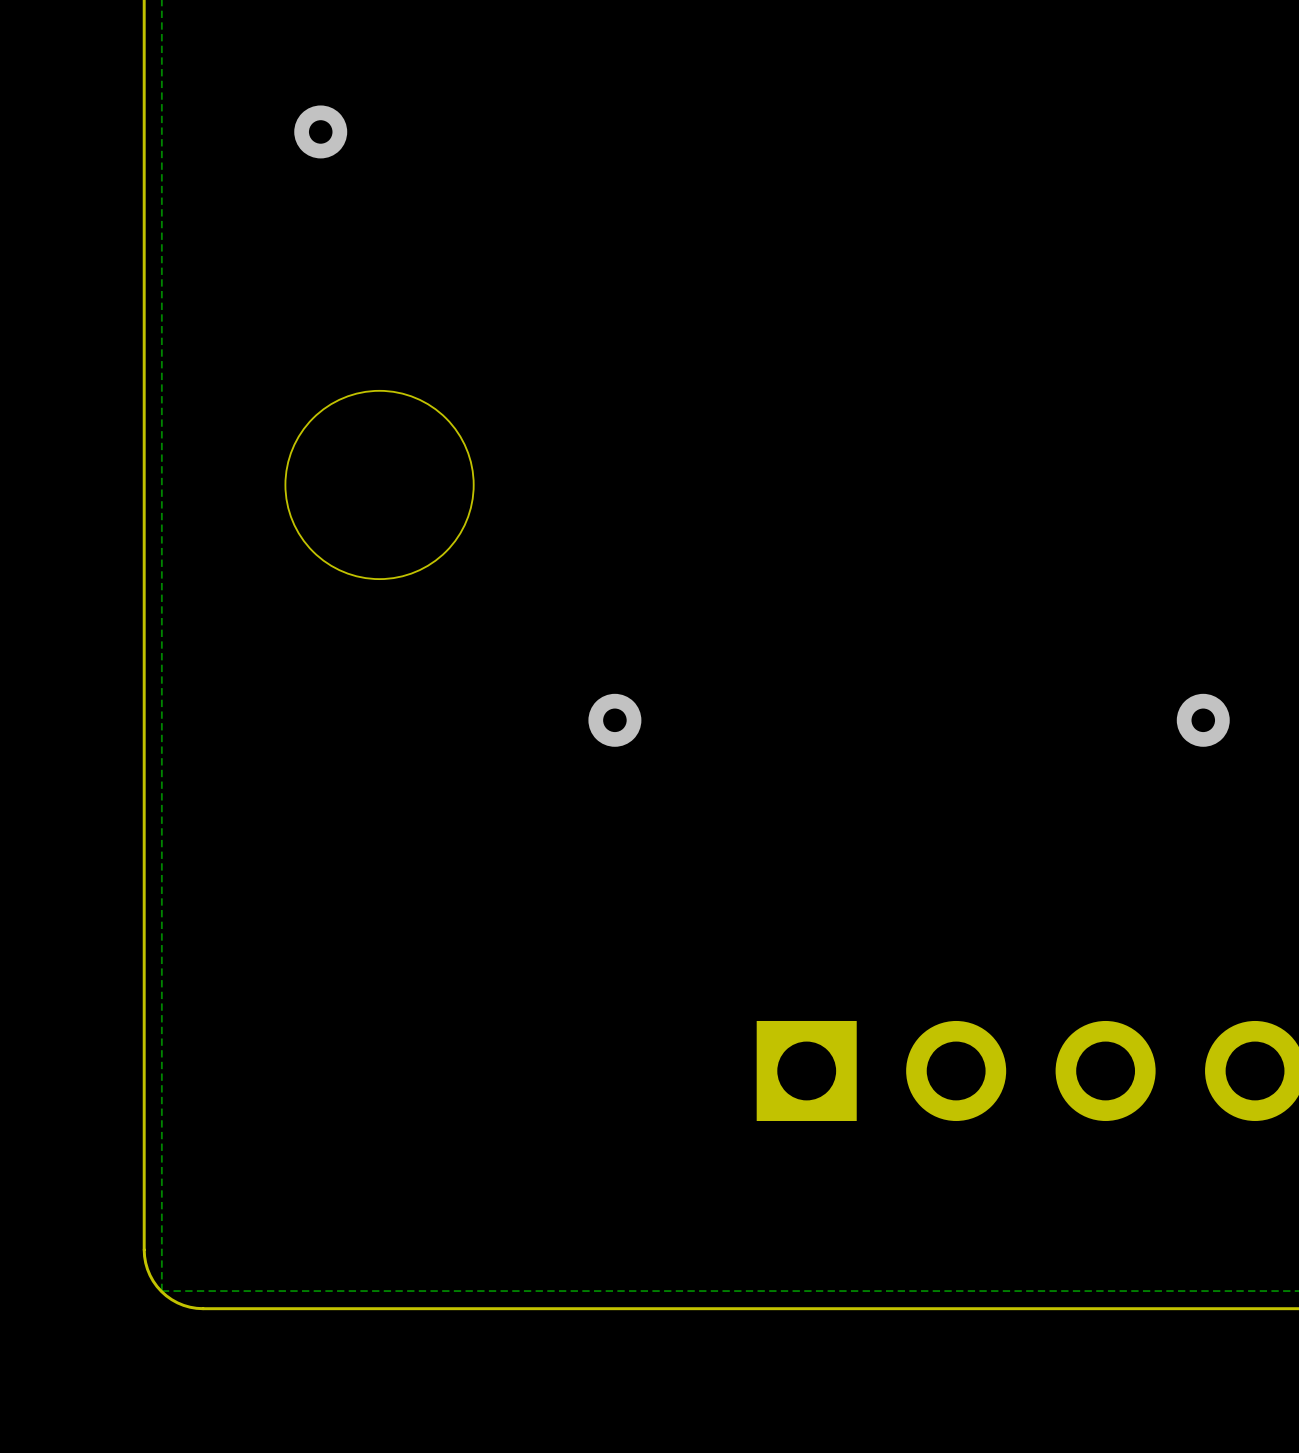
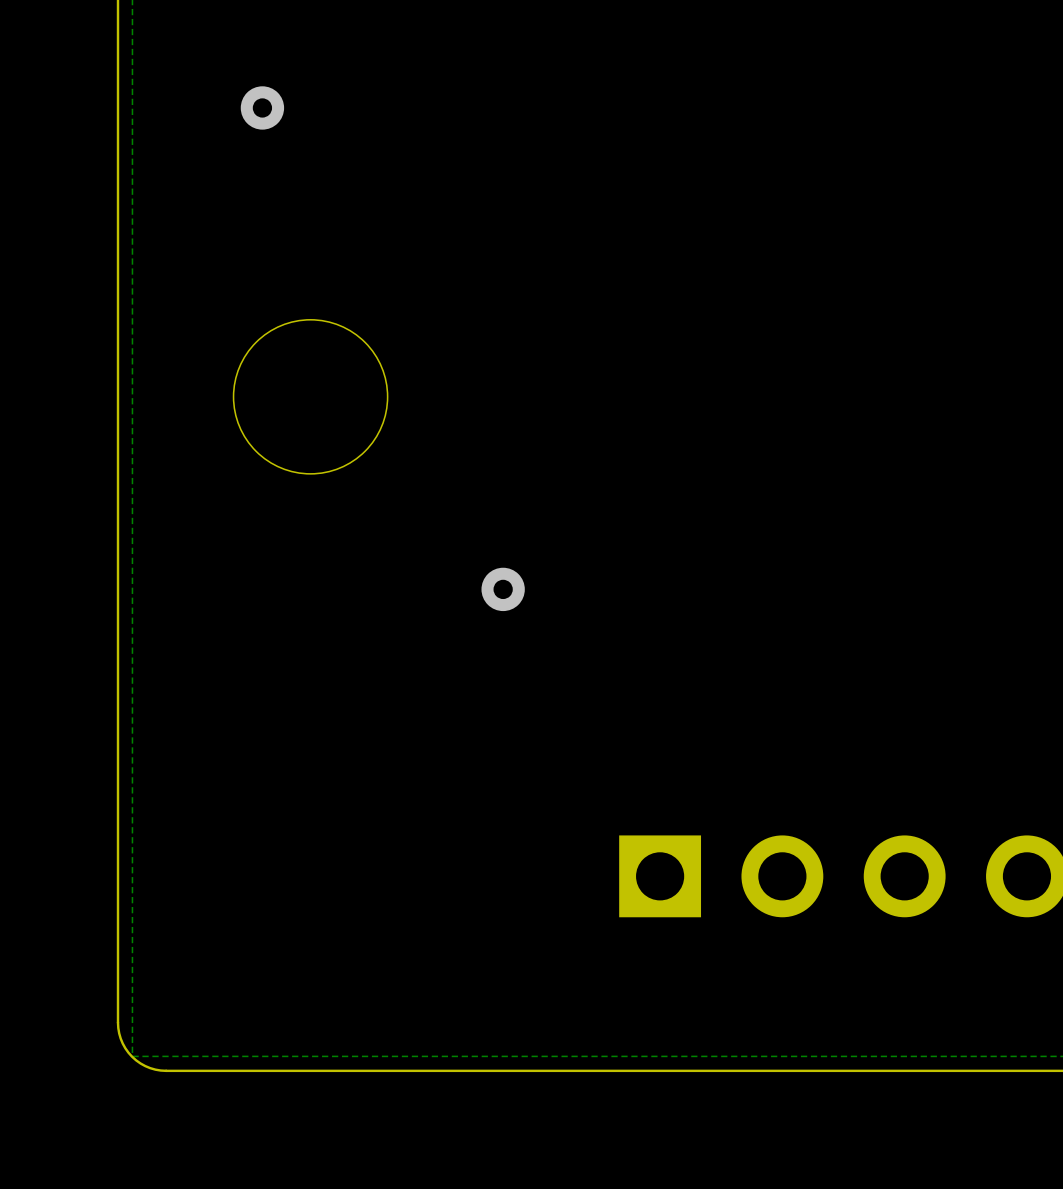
via: (1203, 720) -> none

